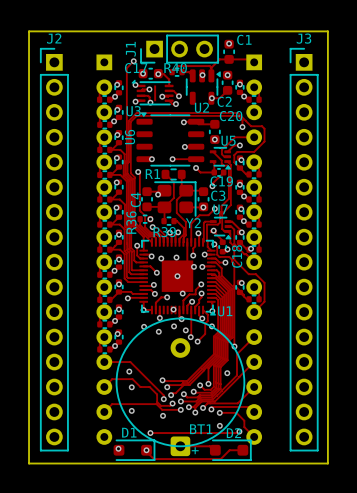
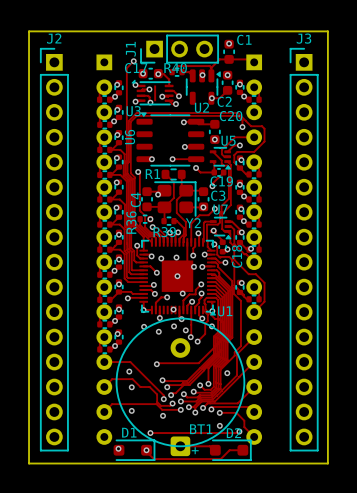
track: (218, 264) (221, 268) (221, 275) (234, 288) (234, 346) -> (218, 264) (232, 280) (233, 293) (240, 300) (240, 346) (220, 369)
track: none -> (211, 297) (204, 300) (205, 309) (215, 318) (219, 318) (223, 322) (223, 338) (198, 363) (156, 364)
via: (234, 346) -> none
via: none -> (156, 364)

